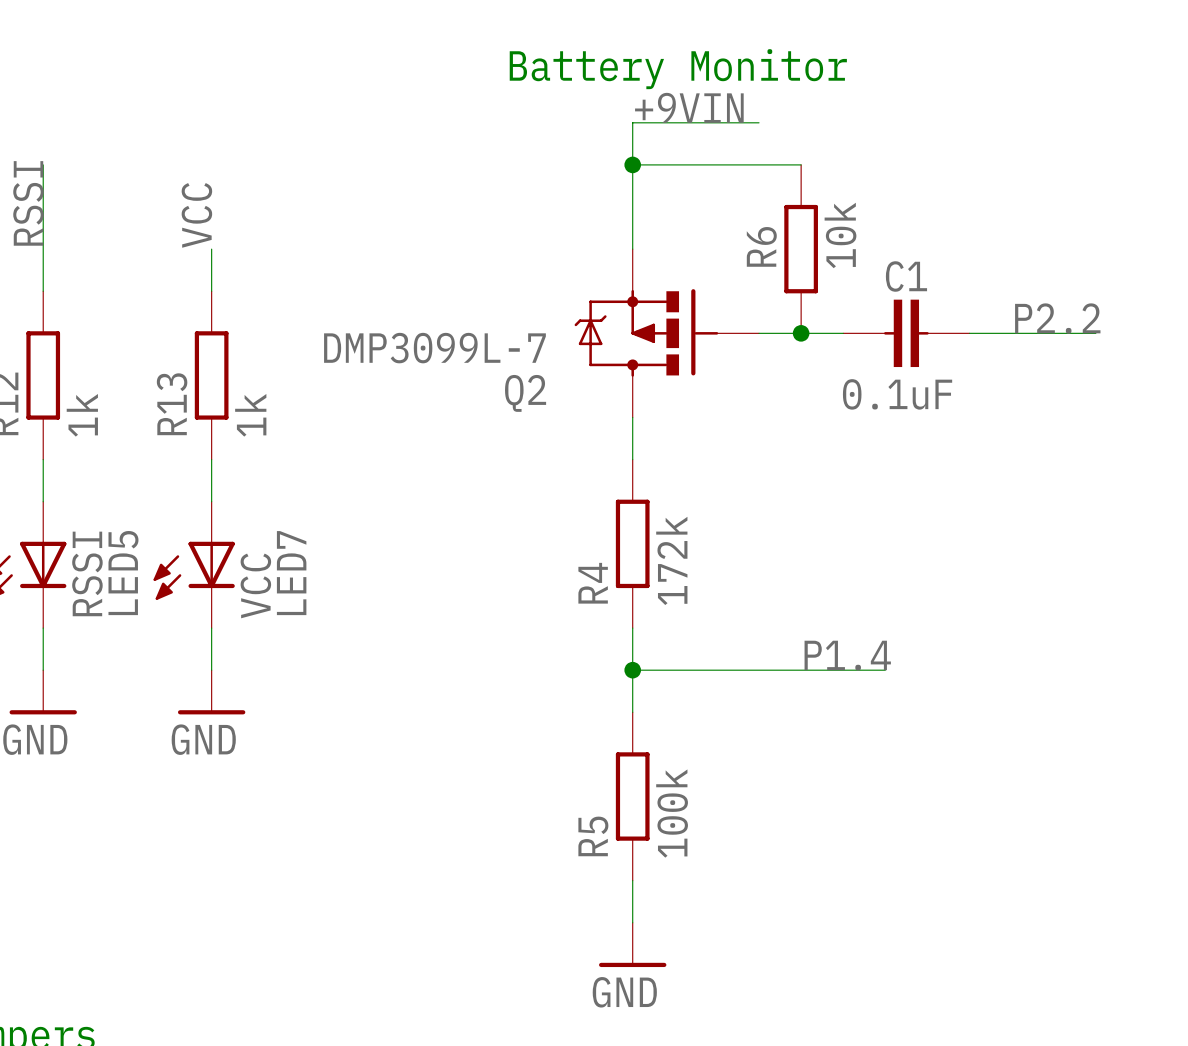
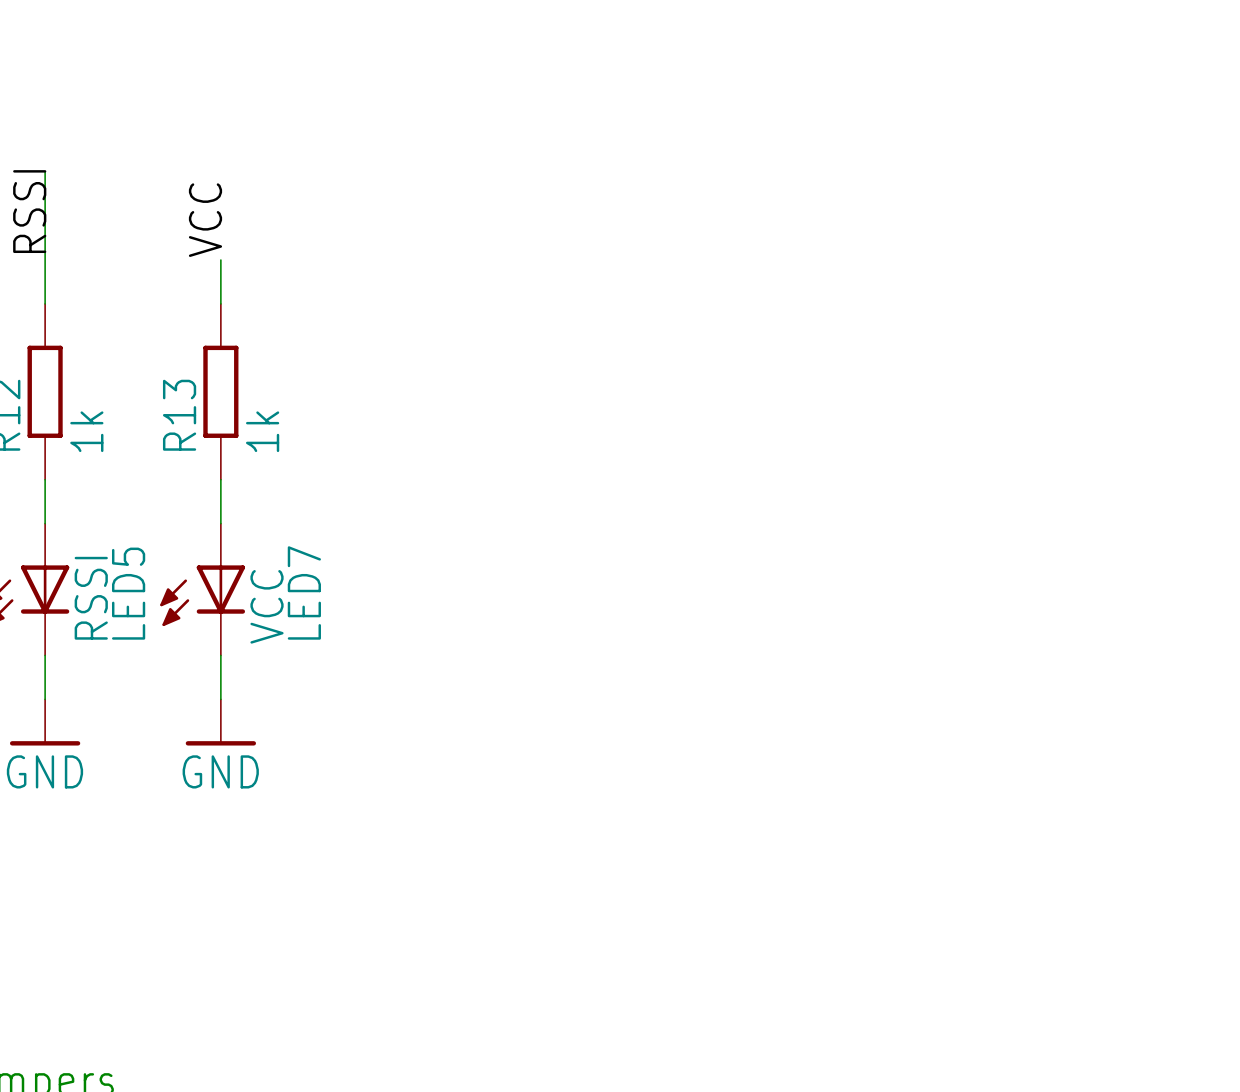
text: Battery Monitor (678, 69) -> none
label: +9VIN (689, 107) -> none
wire: (759, 122) (632, 122) (632, 249) -> none
wire: (632, 164) (801, 164) -> none
junction: (632, 164) -> none
R6: 10k (801, 249) -> none
label: P2.2 (1057, 318) -> none
Q2: DMP3099L-7 (666, 333) -> none
wire: (759, 333) (843, 333) -> none
junction: (801, 333) -> none
C1: 0.1uF (906, 333) -> none
wire: (969, 333) (1095, 333) -> none
wire: (632, 417) (632, 459) -> none
R4: 172k (632, 543) -> none
wire: (632, 628) (632, 712) -> none
label: P1.4 (847, 655) -> none
wire: (632, 670) (885, 670) -> none
junction: (632, 670) -> none
R5: 100k (632, 796) -> none
wire: (632, 880) (632, 922) -> none
power symbol: GND (632, 944) -> none

